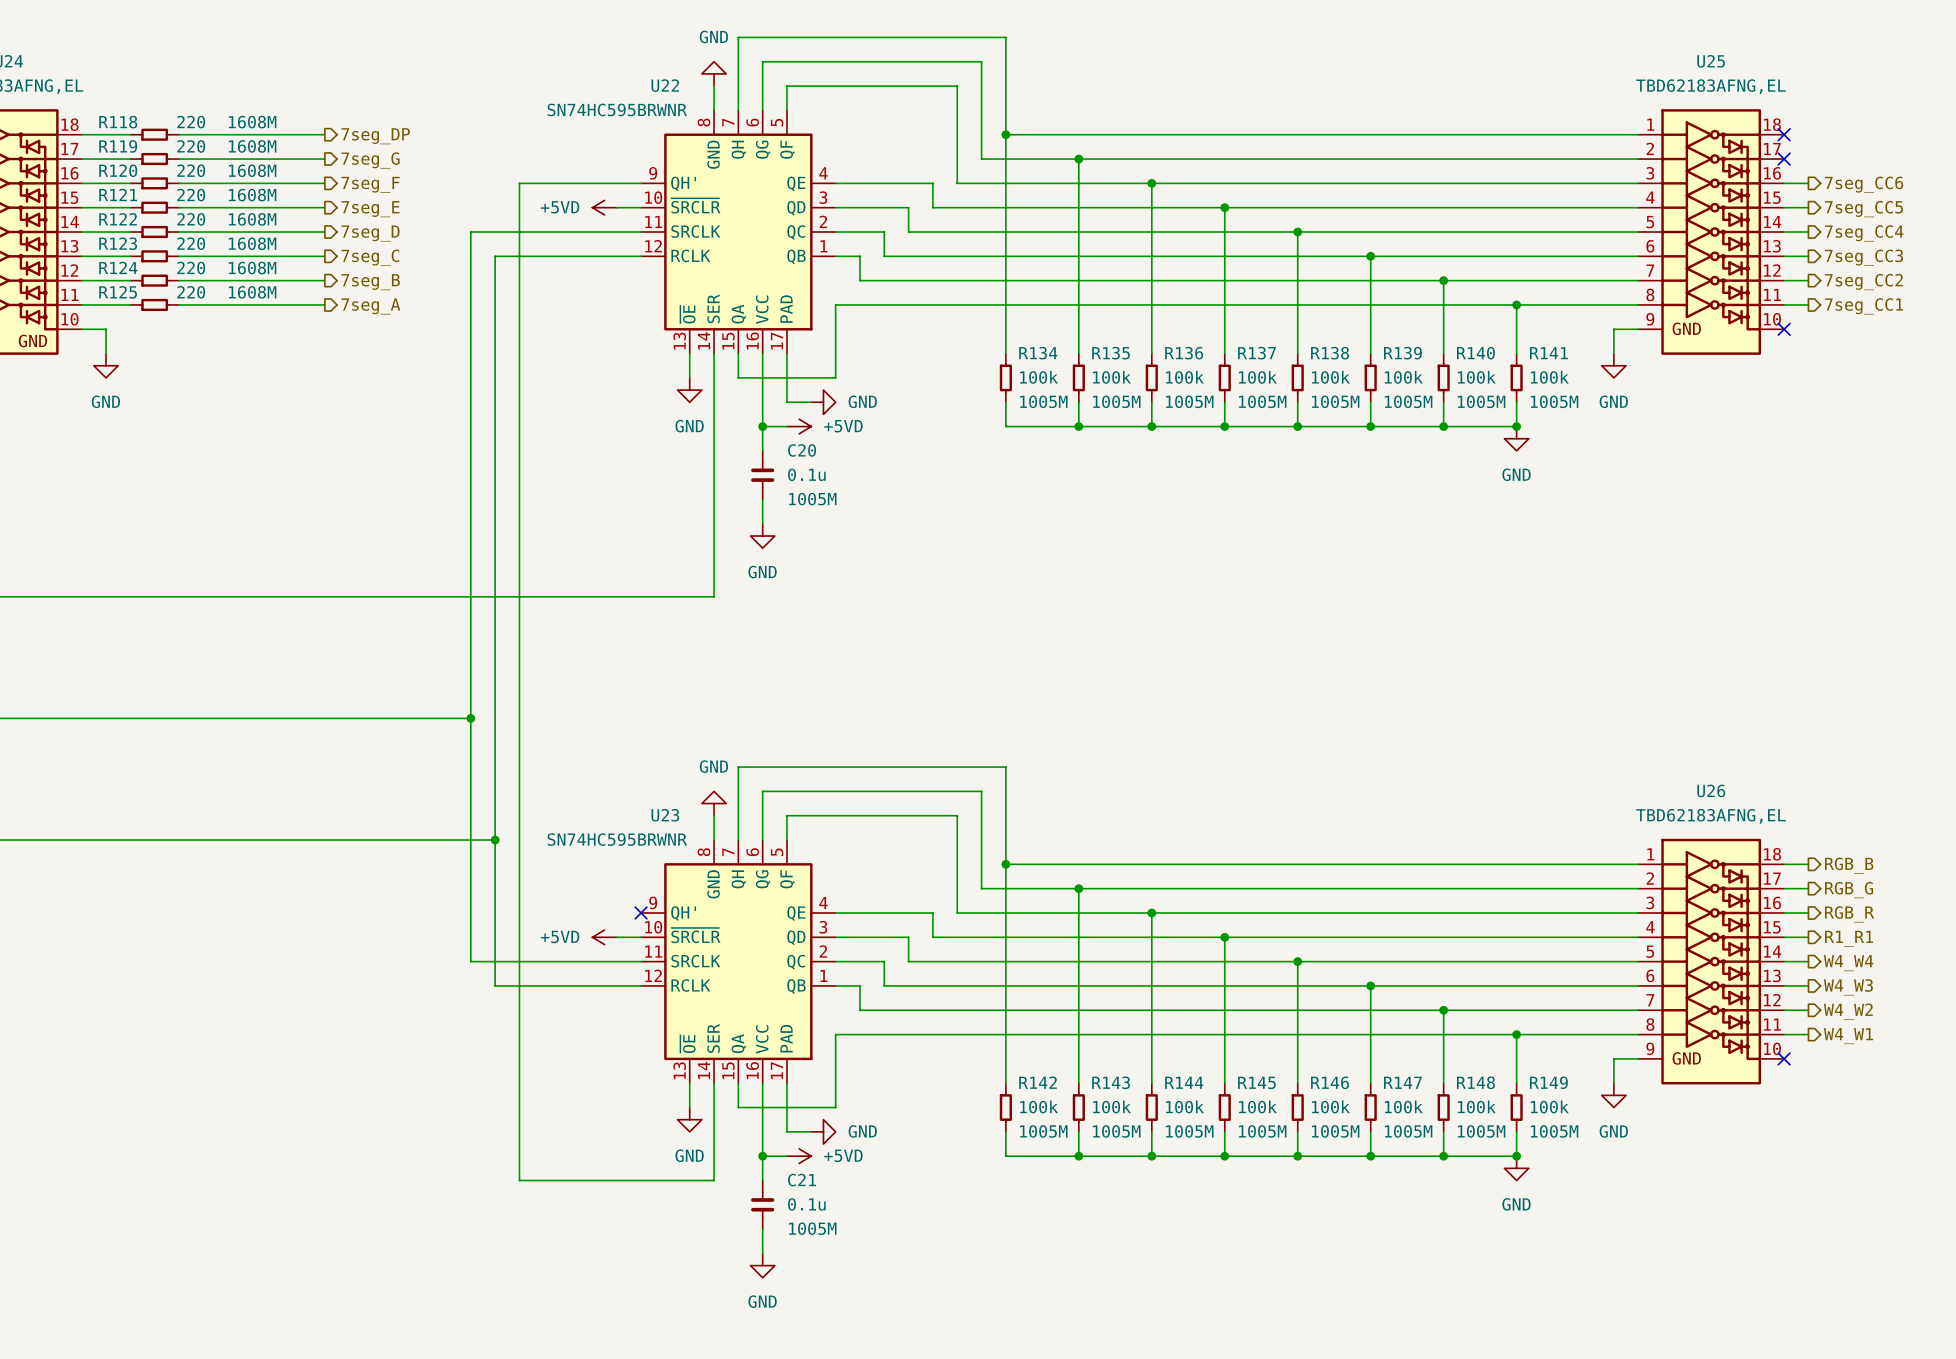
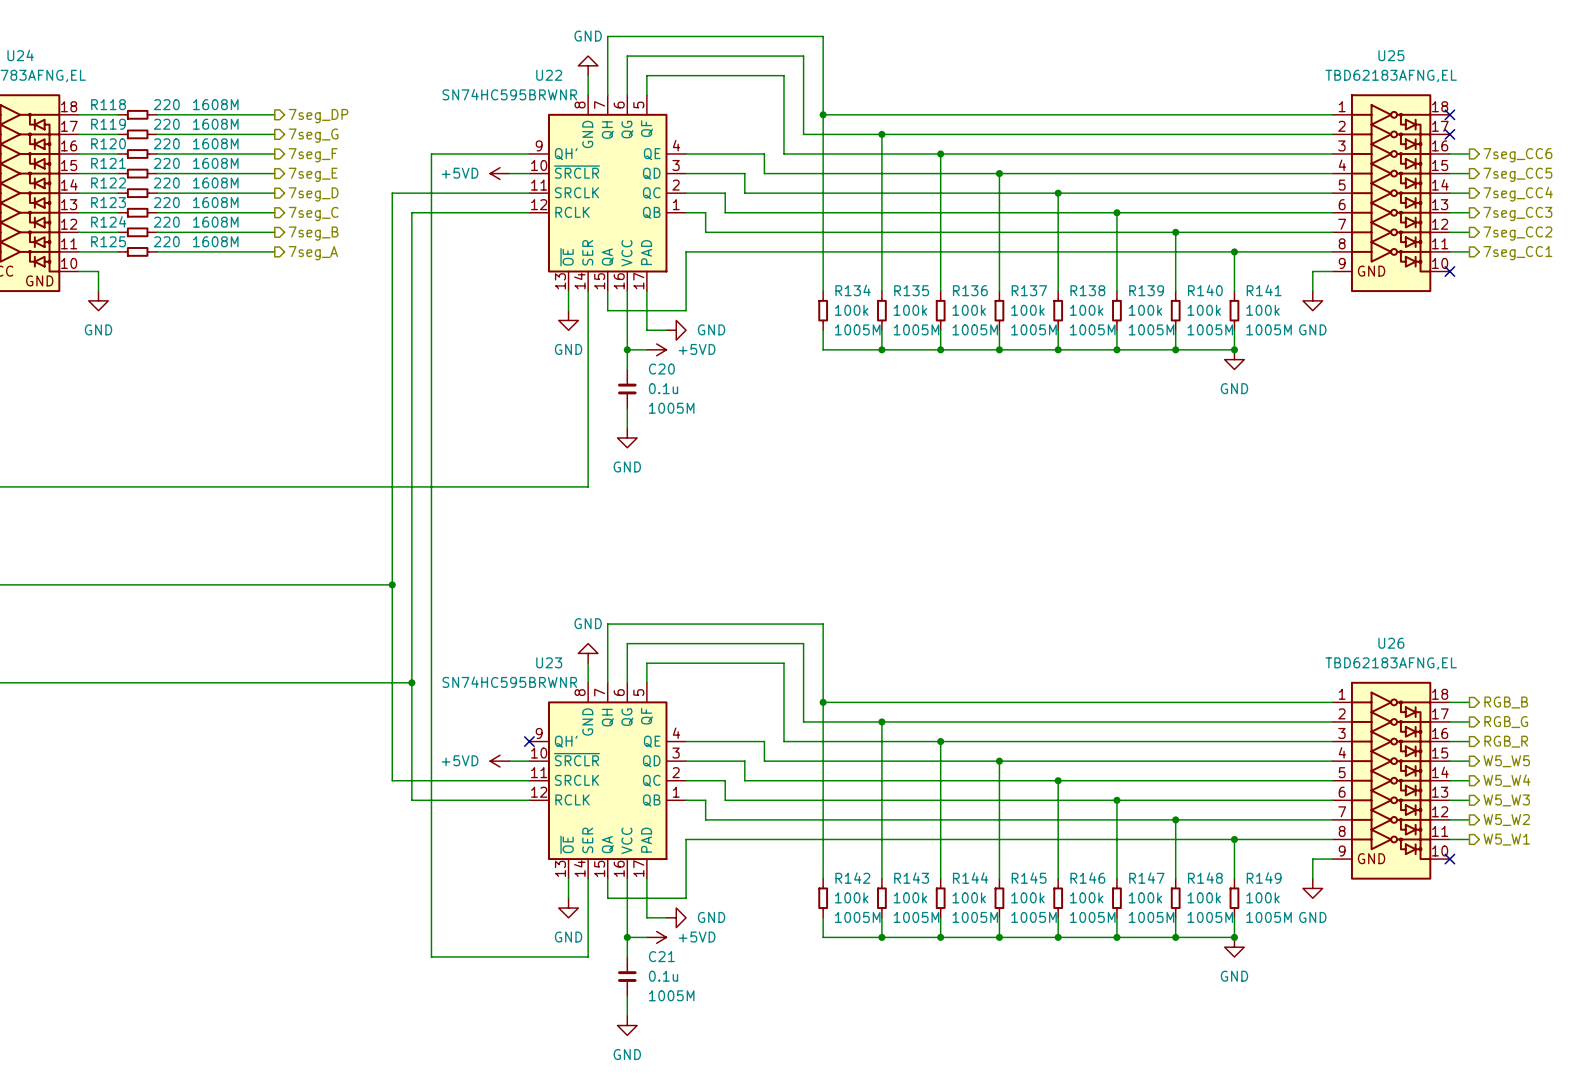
hierarchical label: R1_R1 (1849, 938) -> W5_W5 (1506, 761)
hierarchical label: W4_W4 (1848, 963) -> W5_W4 (1506, 780)
hierarchical label: W4_W3 (1848, 987) -> W5_W3 (1506, 800)
hierarchical label: W4_W2 (1848, 1011) -> W5_W2 (1506, 819)
hierarchical label: W4_W1 (1848, 1036) -> W5_W1 (1506, 839)

